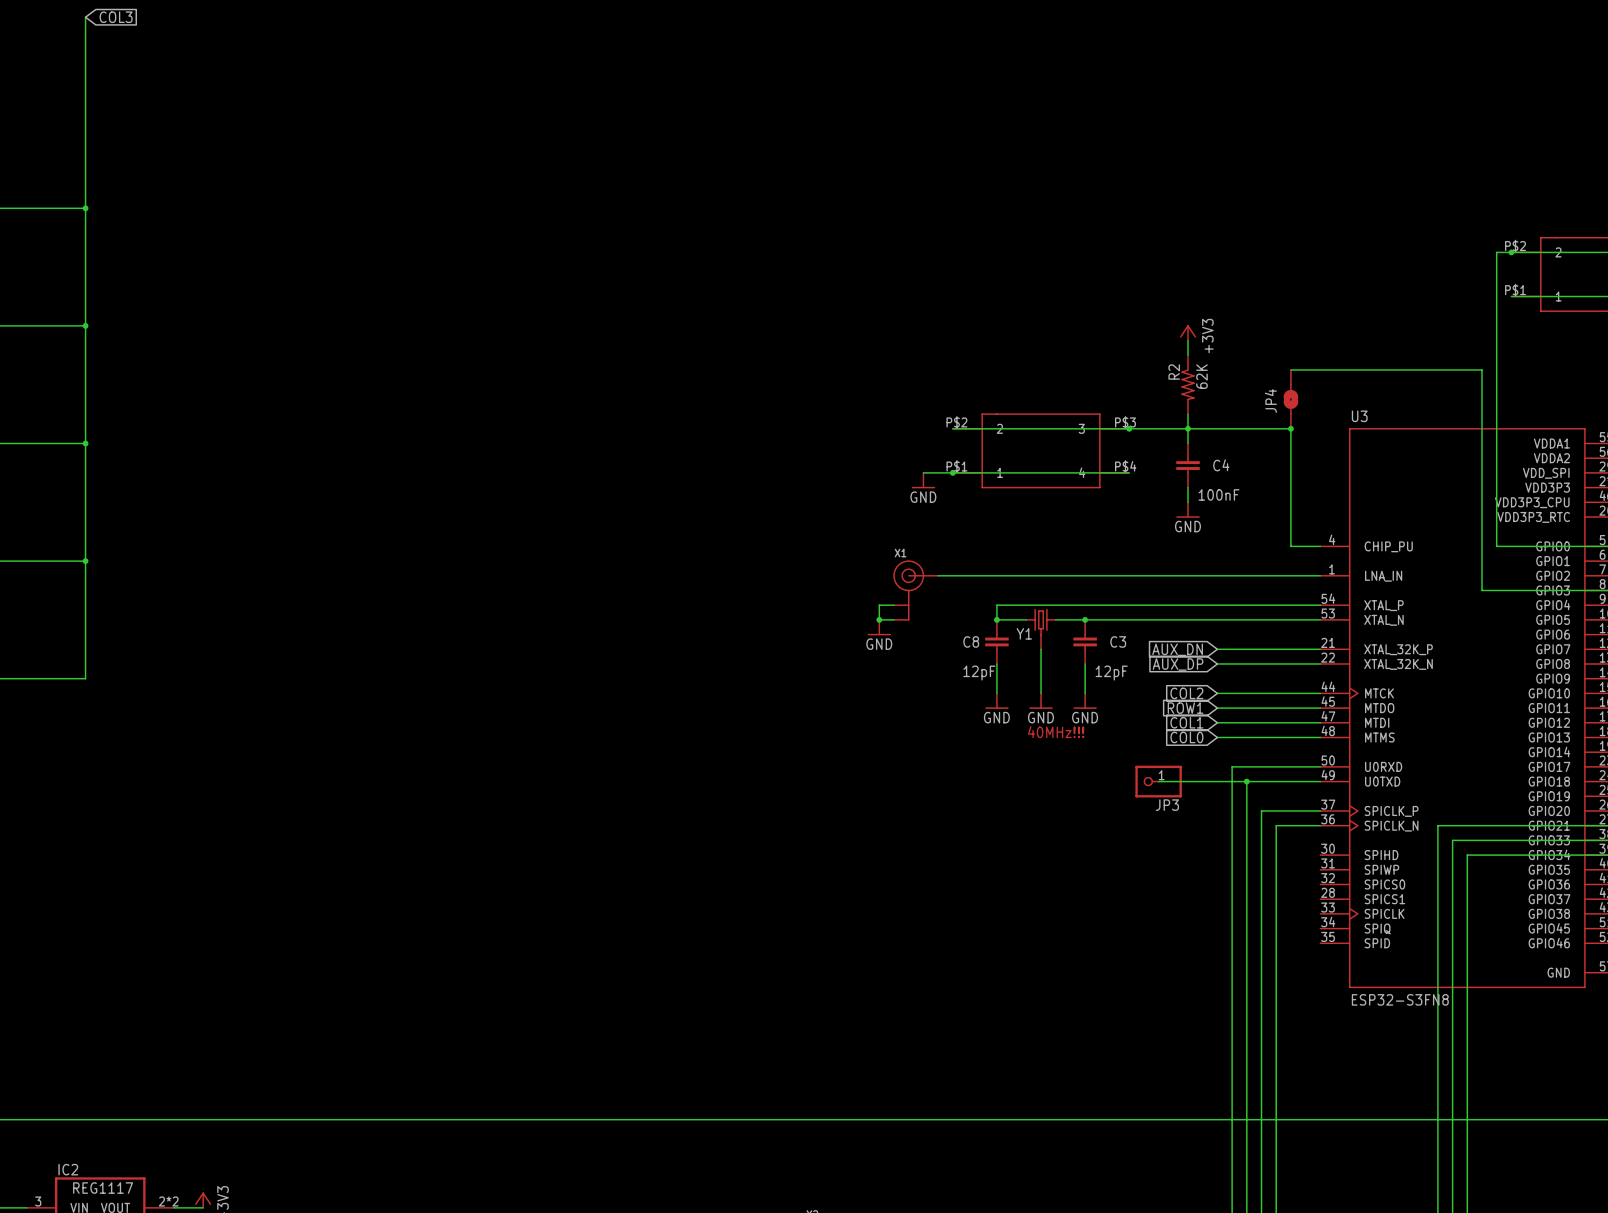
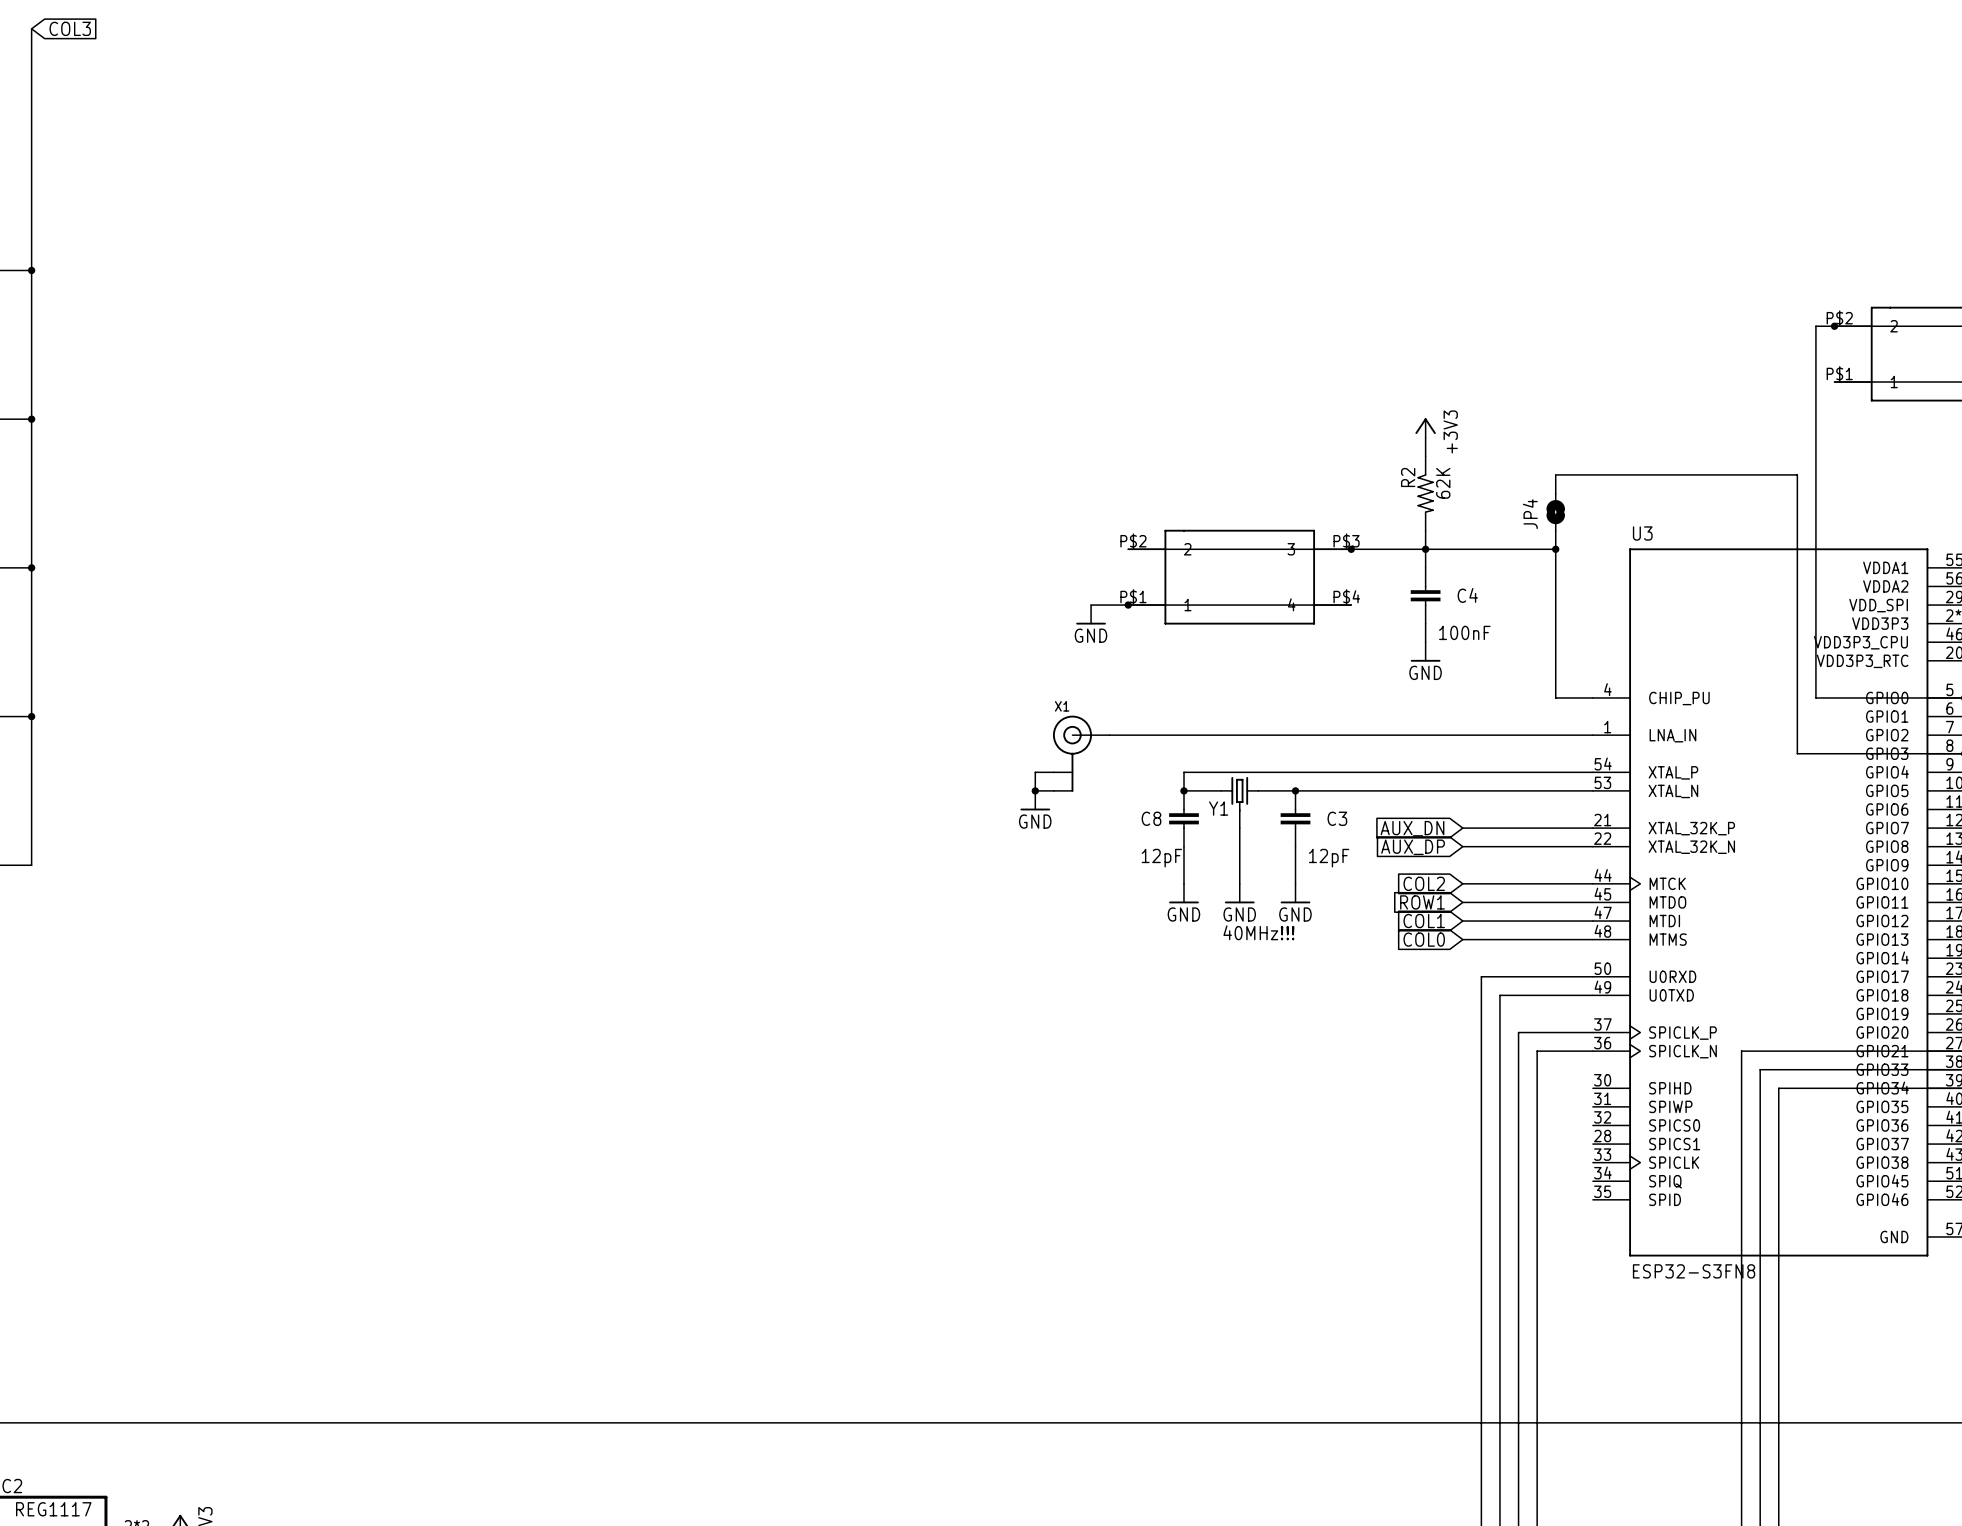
wire: (1158, 781) (1246, 781) -> none
JP3: (1158, 781) -> none
junction: (1246, 781) -> none

